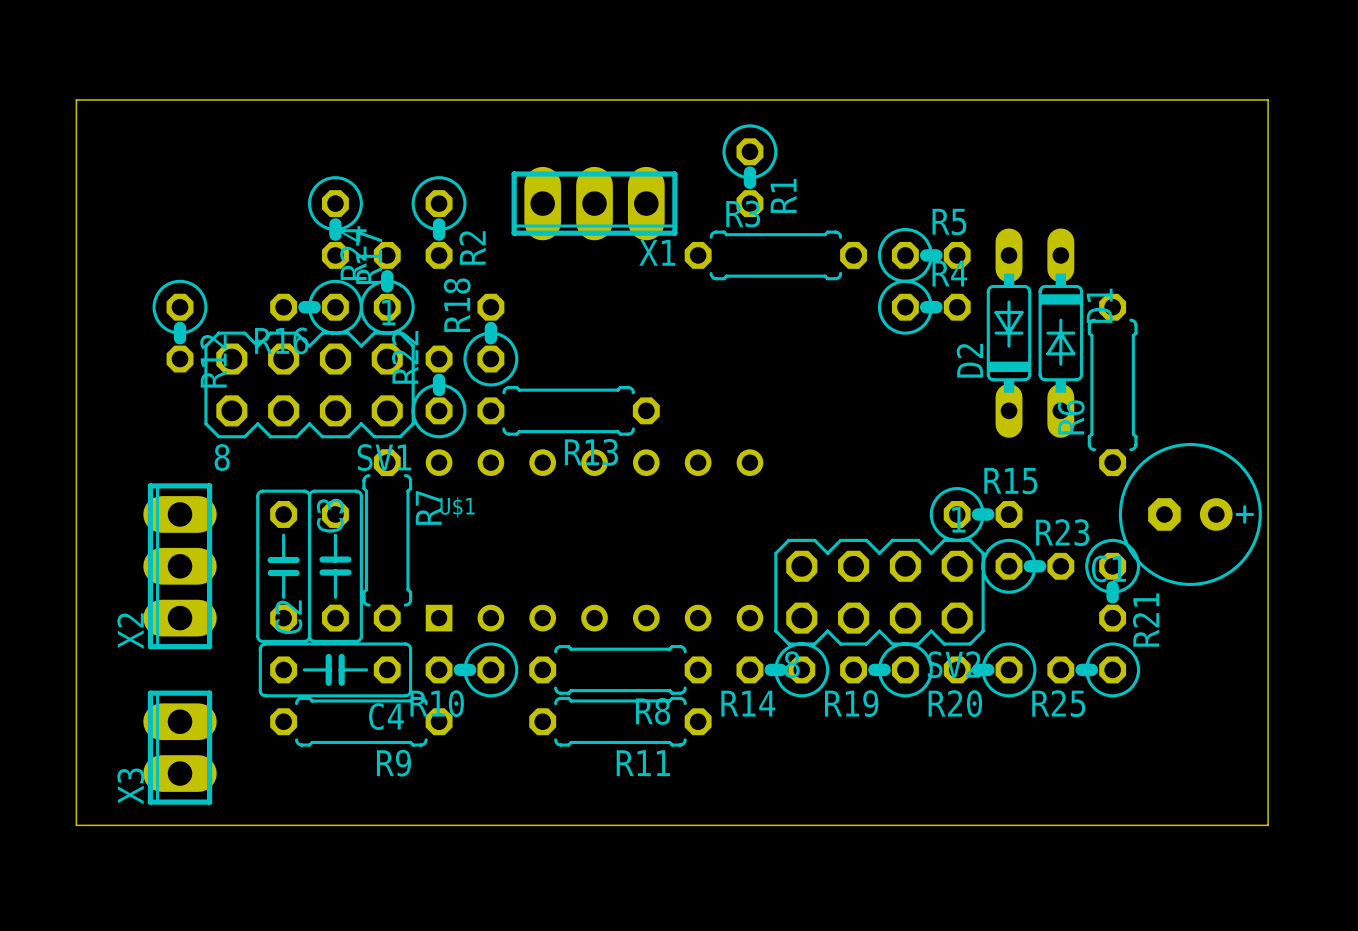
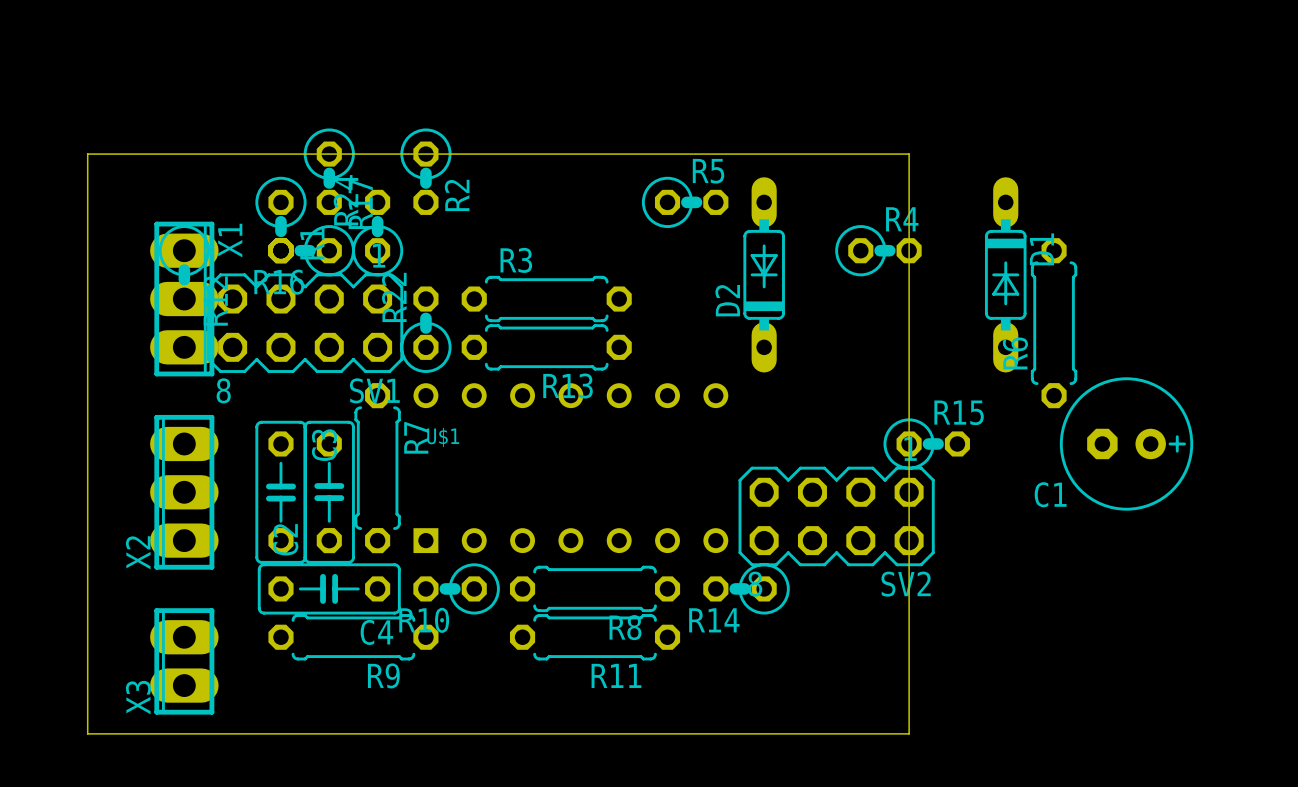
R1 position: (749, 170) -> (280, 220)
board edge: (76, 203) (76, 99) (1268, 99) (1268, 825) (957, 825) -> (87, 154) (909, 154) (909, 733)
X1 rotation: 0° (594, 203) -> 90° counterclockwise (184, 299)
X1 position: (594, 203) -> (184, 299)
R3 position: (775, 255) -> (546, 299)
R5 position: (924, 255) -> (685, 202)
D2 position: (1009, 333) -> (764, 274)
R18: (490, 340) -> none
R23: (1027, 566) -> none
R21: (1112, 585) -> none
R19: (886, 669) -> none
R20: (990, 669) -> none
R25: (1093, 669) -> none

